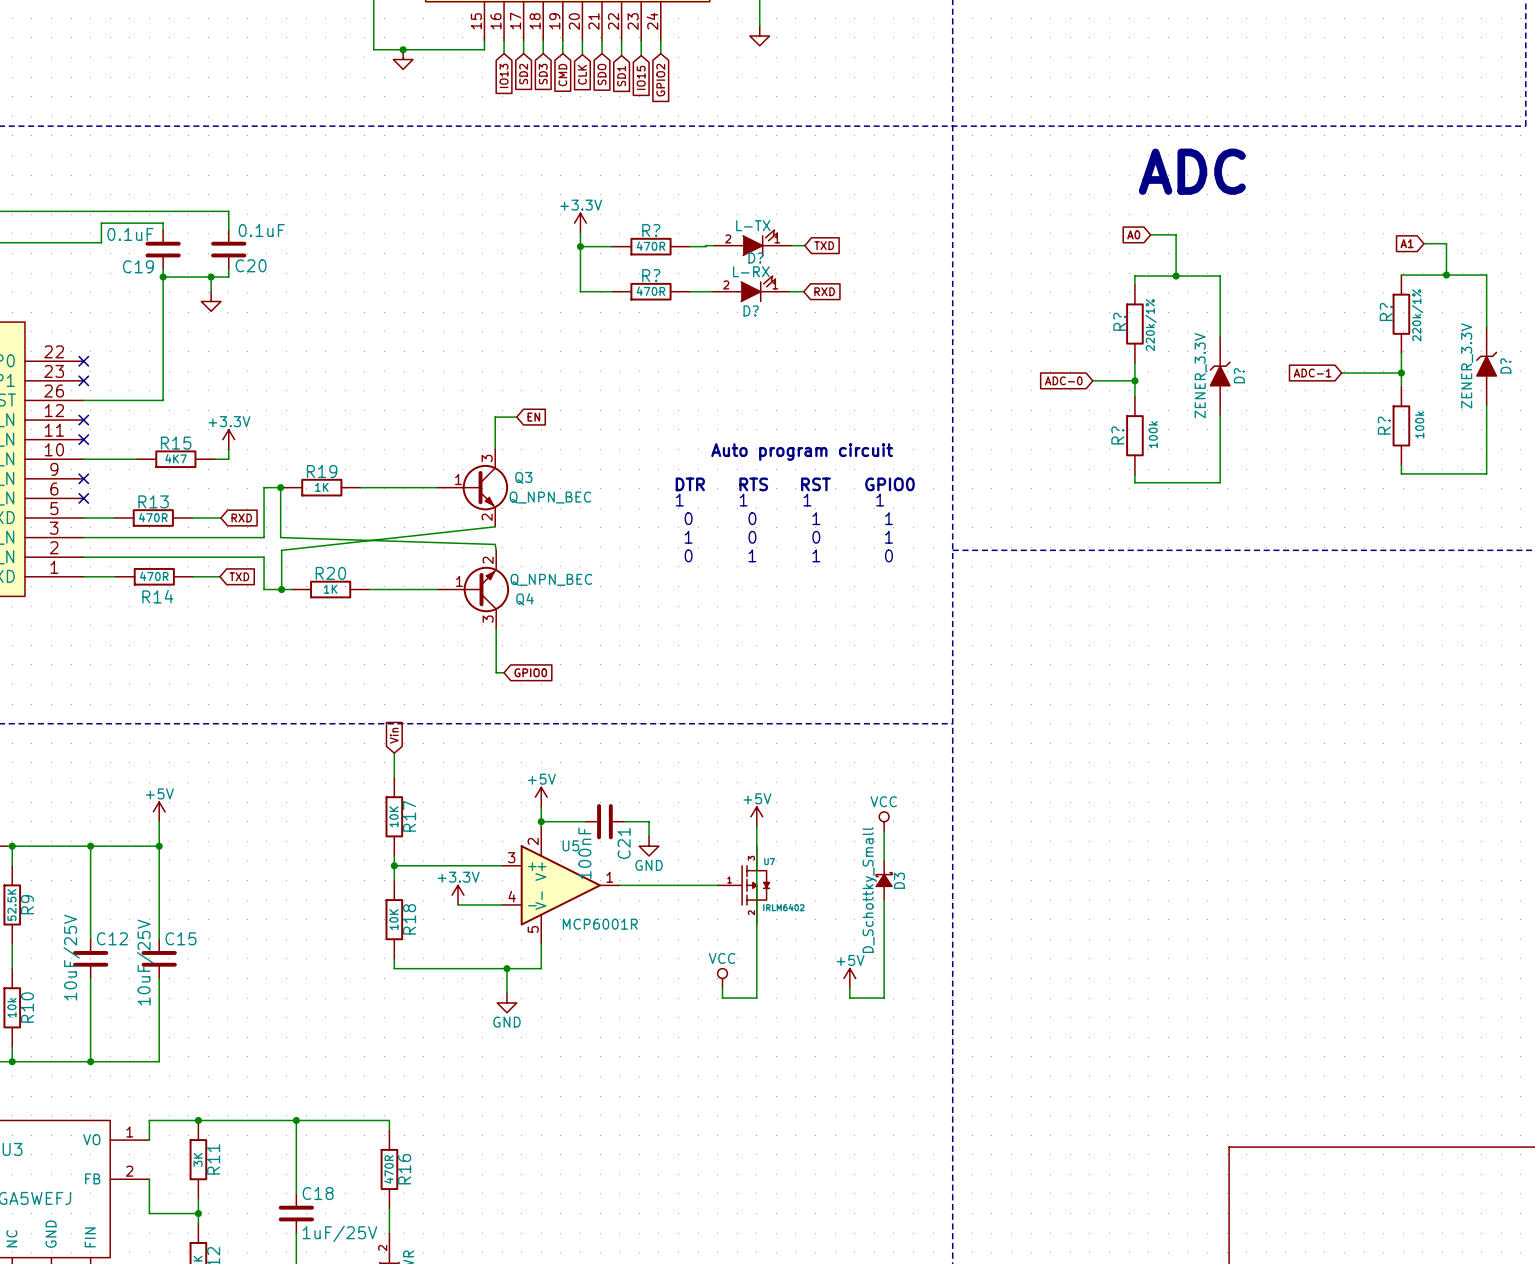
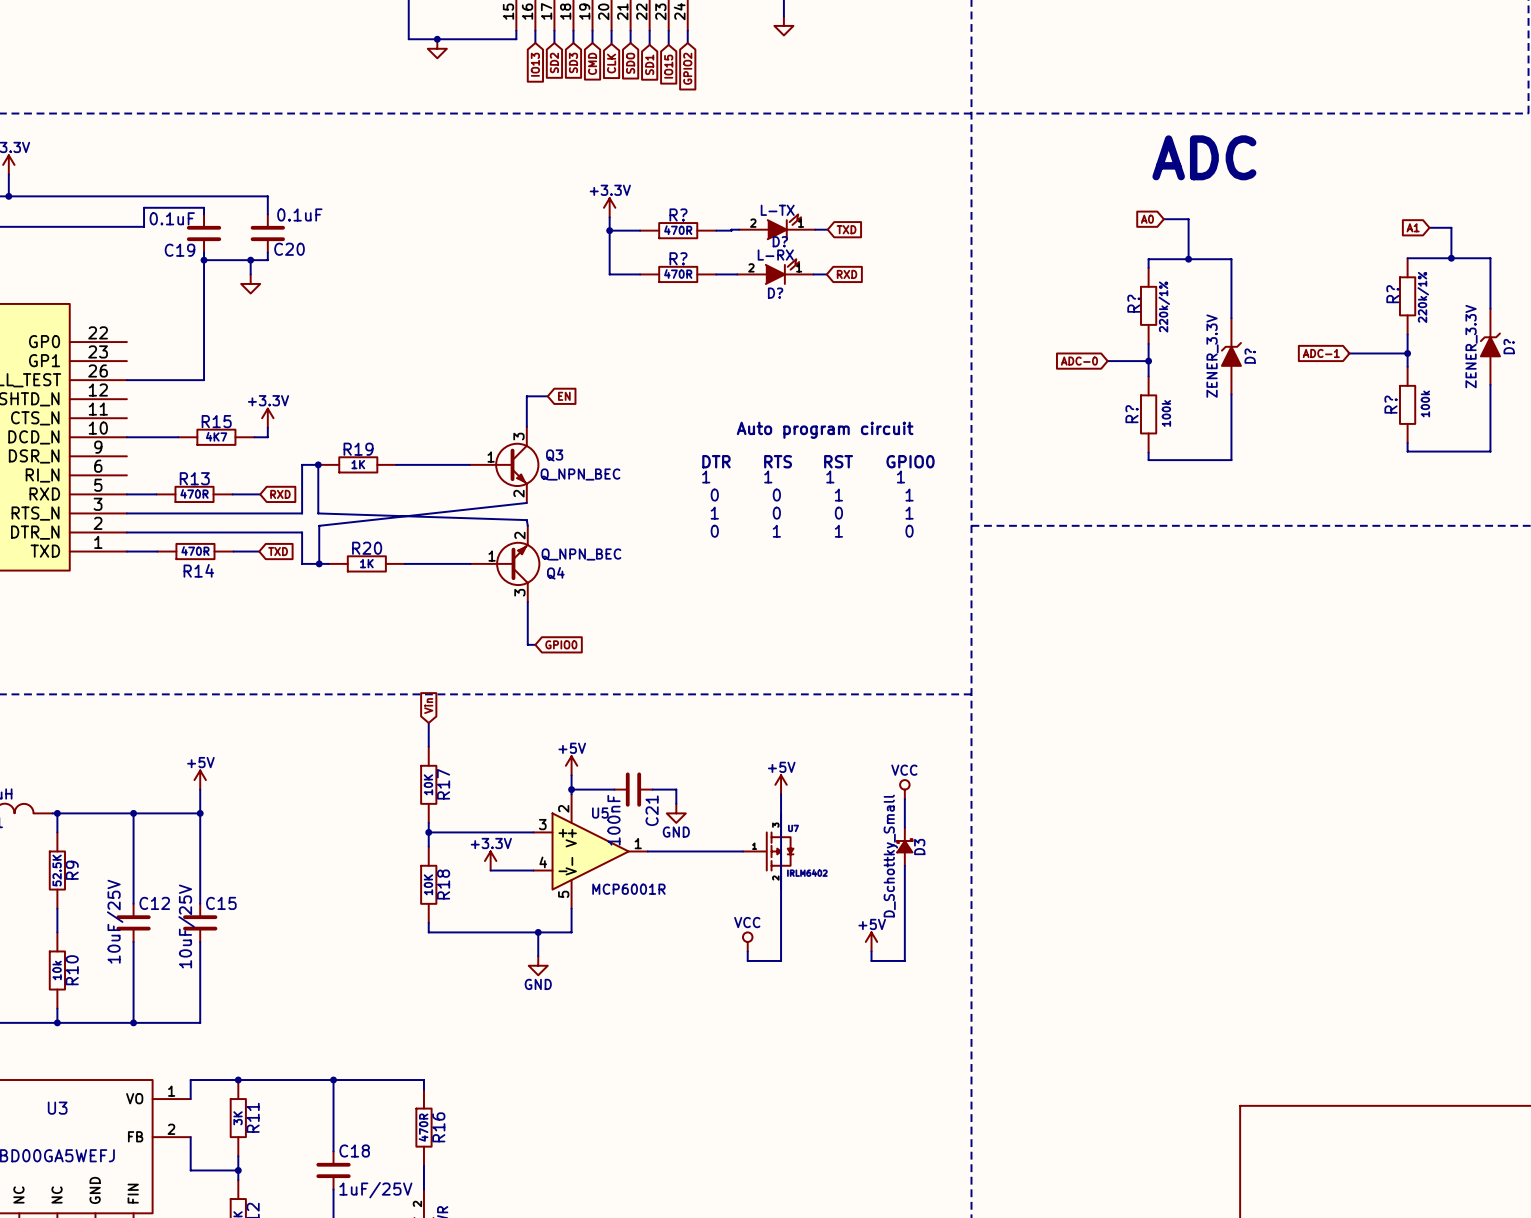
no-connect mark: (83, 361) -> none
no-connect mark: (83, 380) -> none
no-connect mark: (83, 420) -> none
no-connect mark: (83, 439) -> none
no-connect mark: (83, 478) -> none
no-connect mark: (83, 498) -> none

